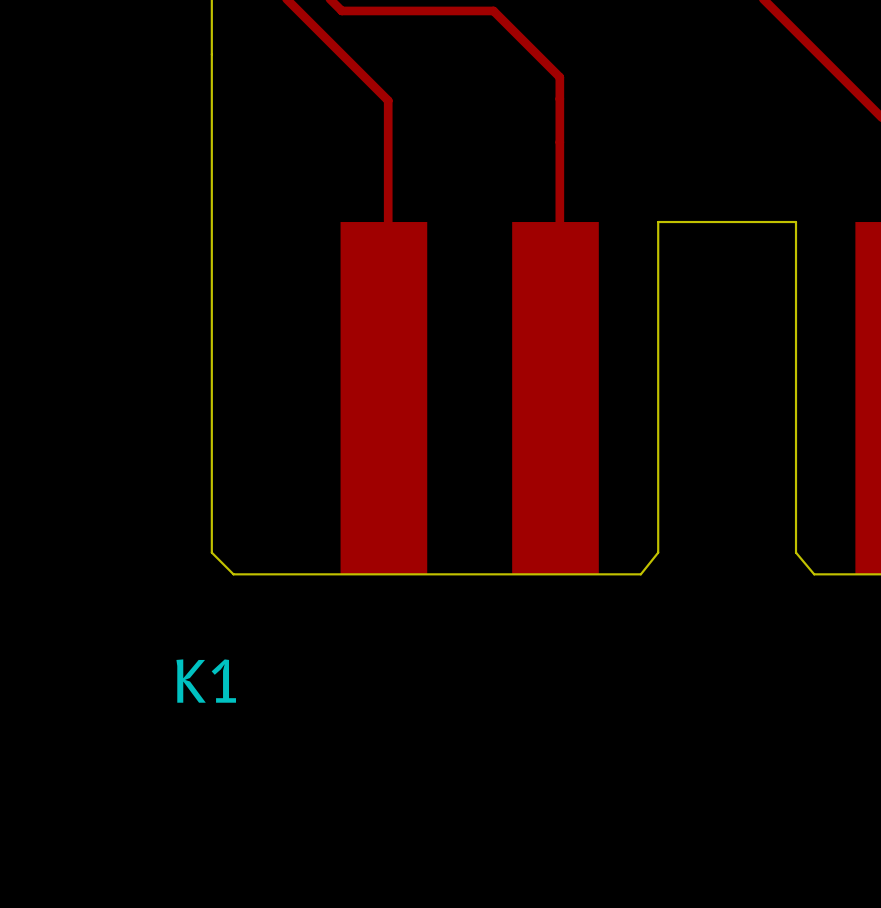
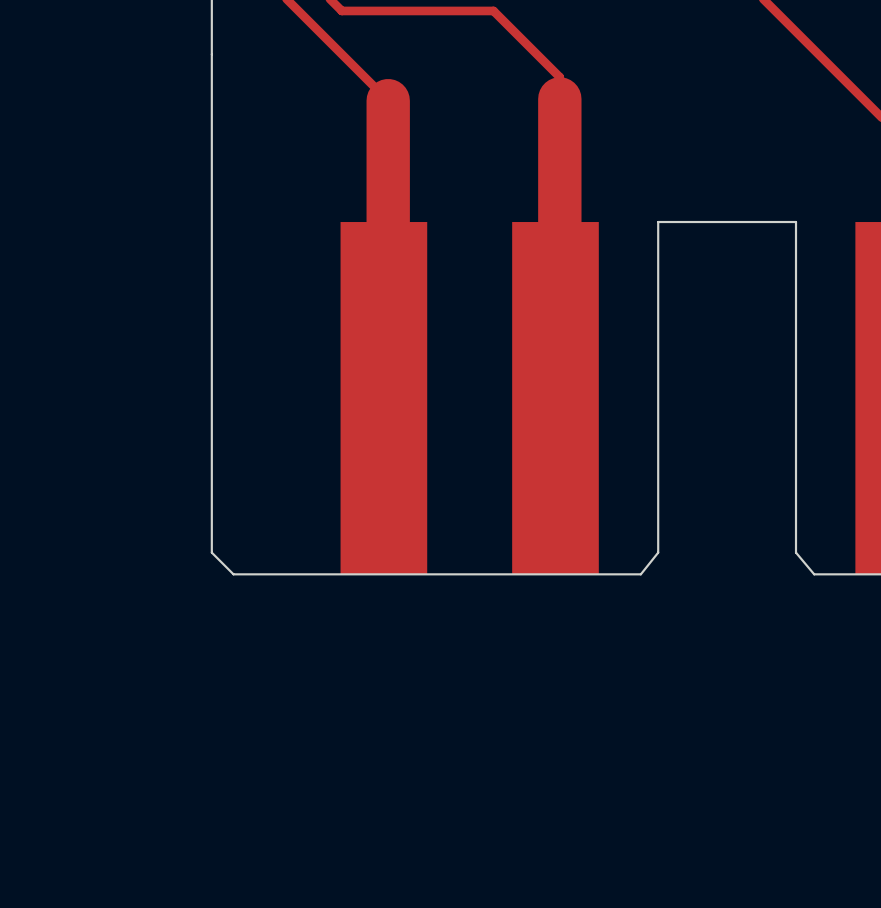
track width: thin (559, 98) (559, 376) -> thick (559, 98) (559, 376)
track width: thin (388, 100) (388, 376) -> thick (388, 100) (388, 376)
K1 name: K1 (206, 681) -> none

